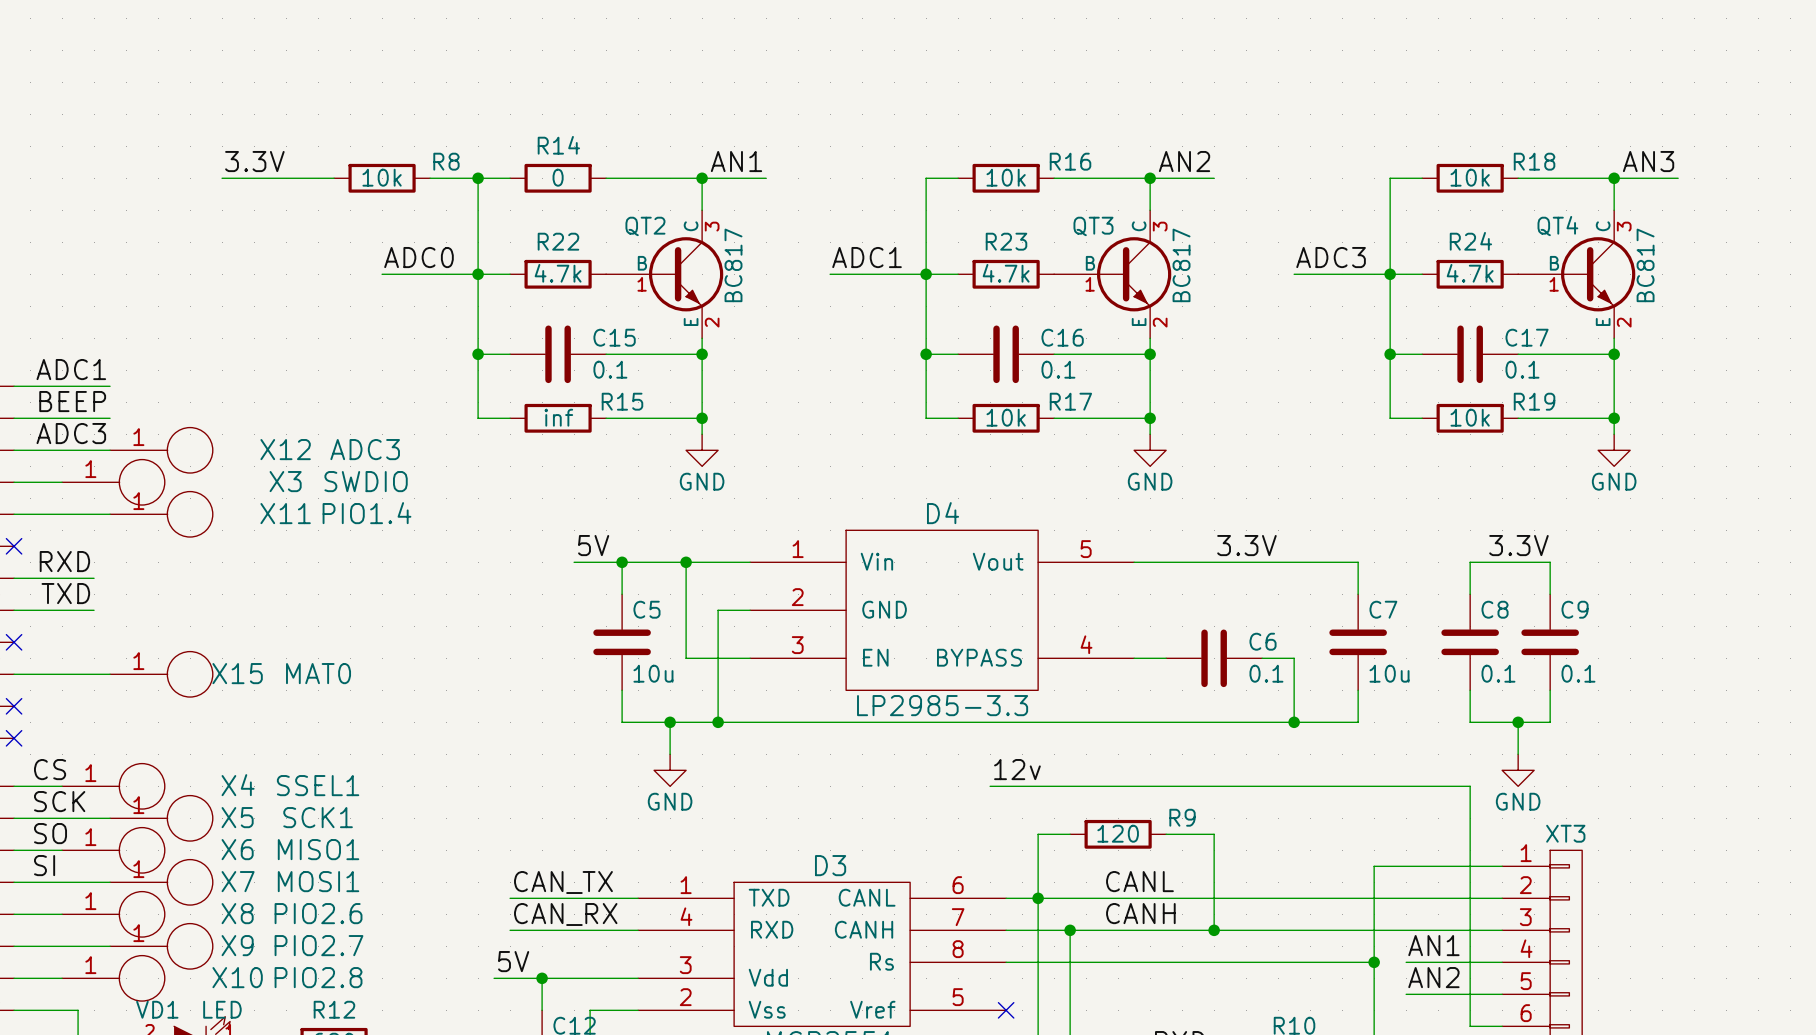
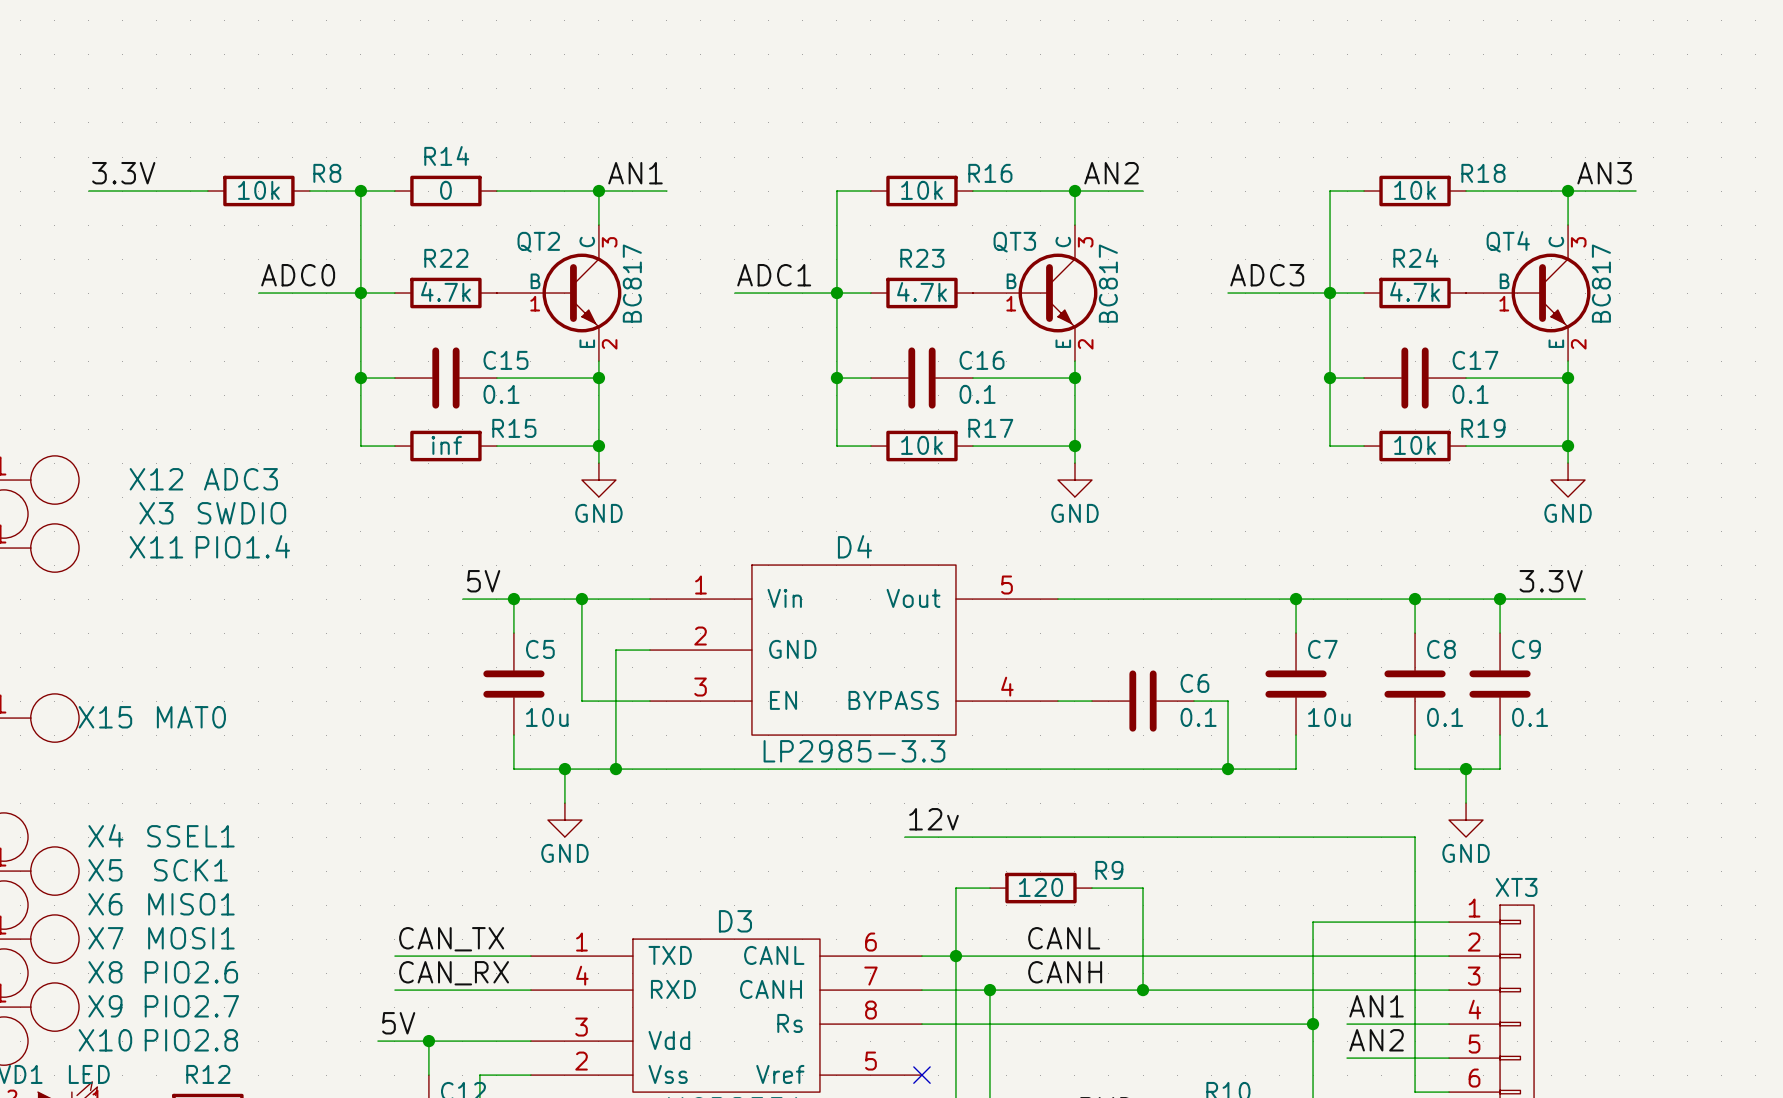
label: 3.3V (1246, 545) -> none
label position: 3.3V (1518, 545) -> 3.3V (1551, 581)
wire: none -> (1296, 599) (1415, 599)
junction: none -> (1296, 599)
junction: none -> (1415, 599)
wire: none -> (1500, 599) (1585, 599)
junction: none -> (1500, 599)

